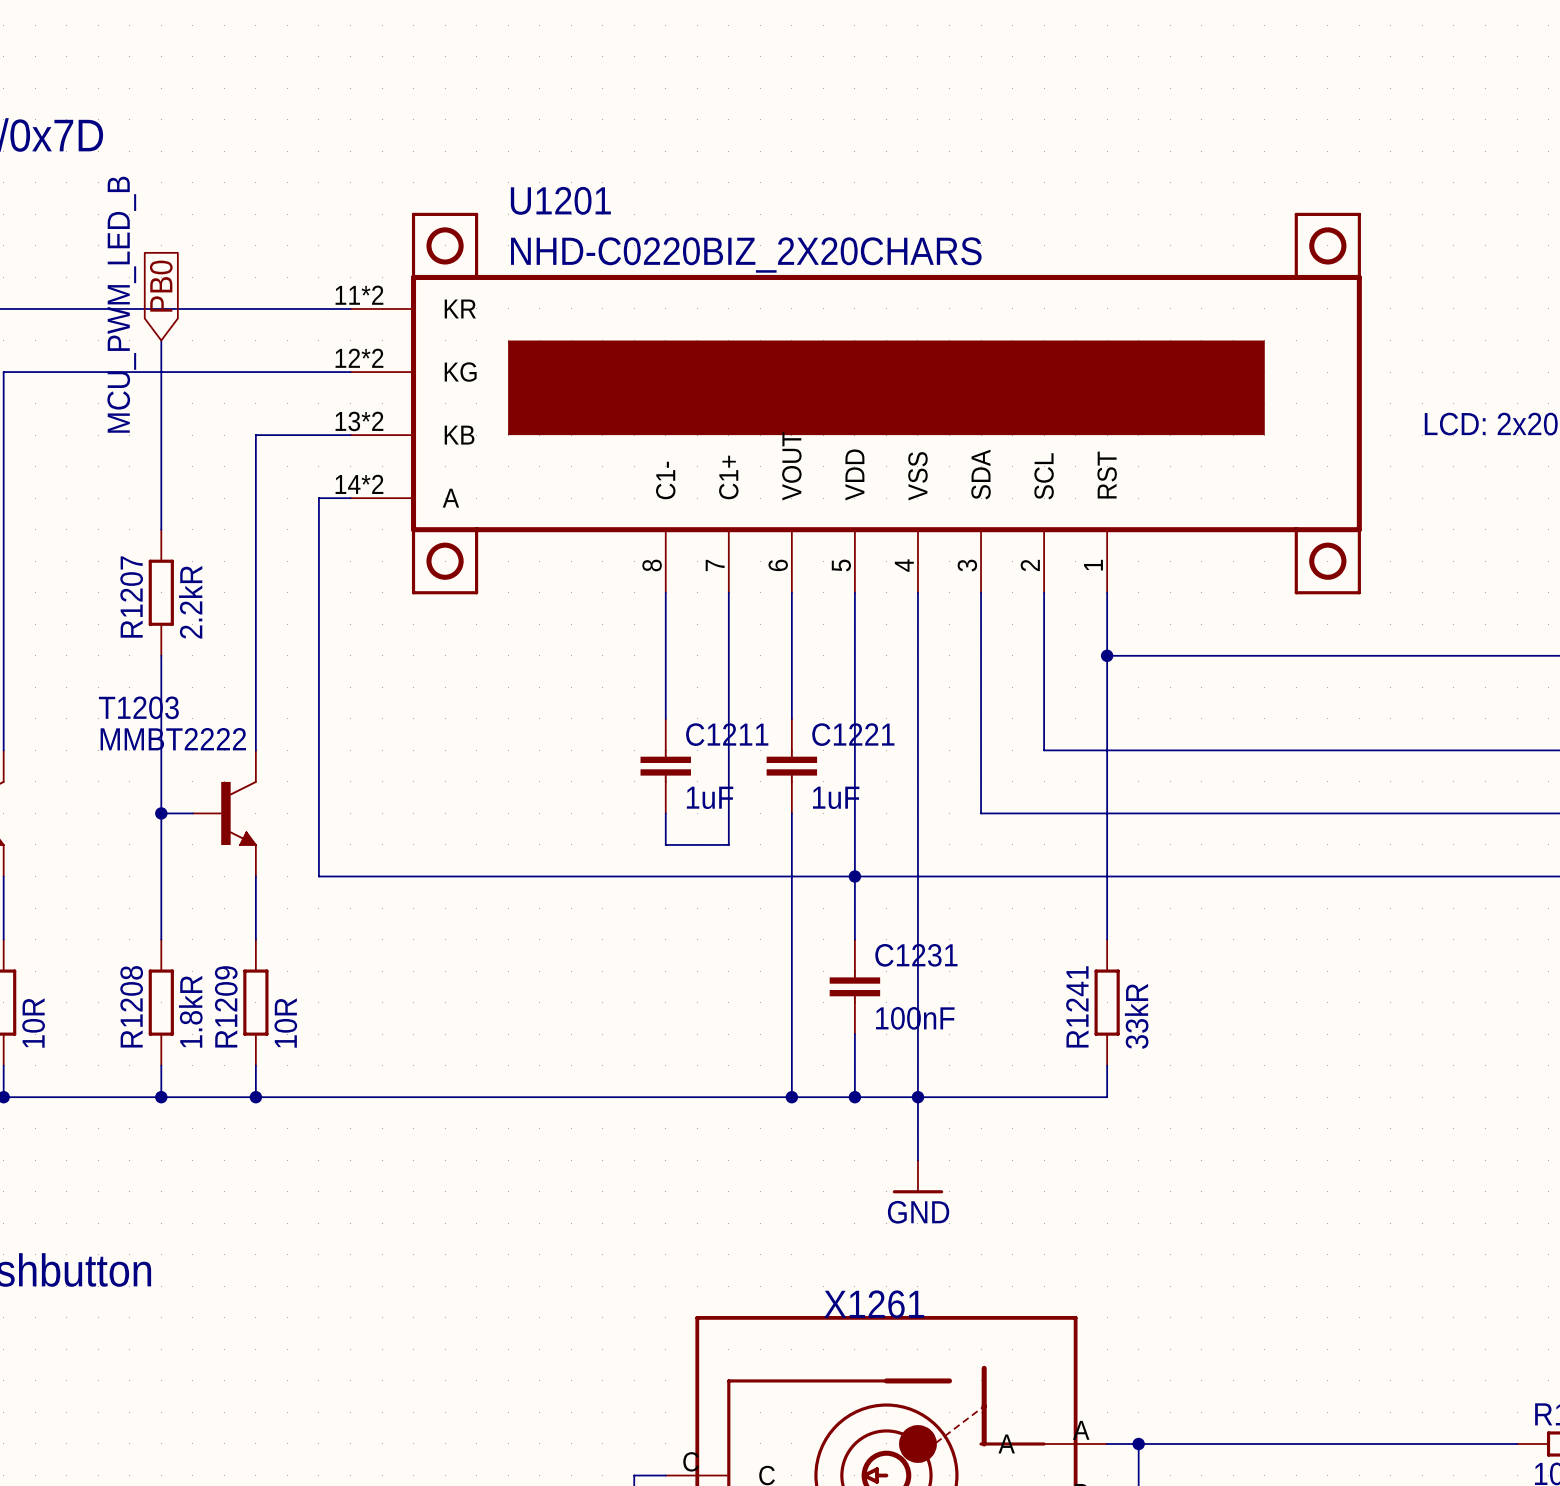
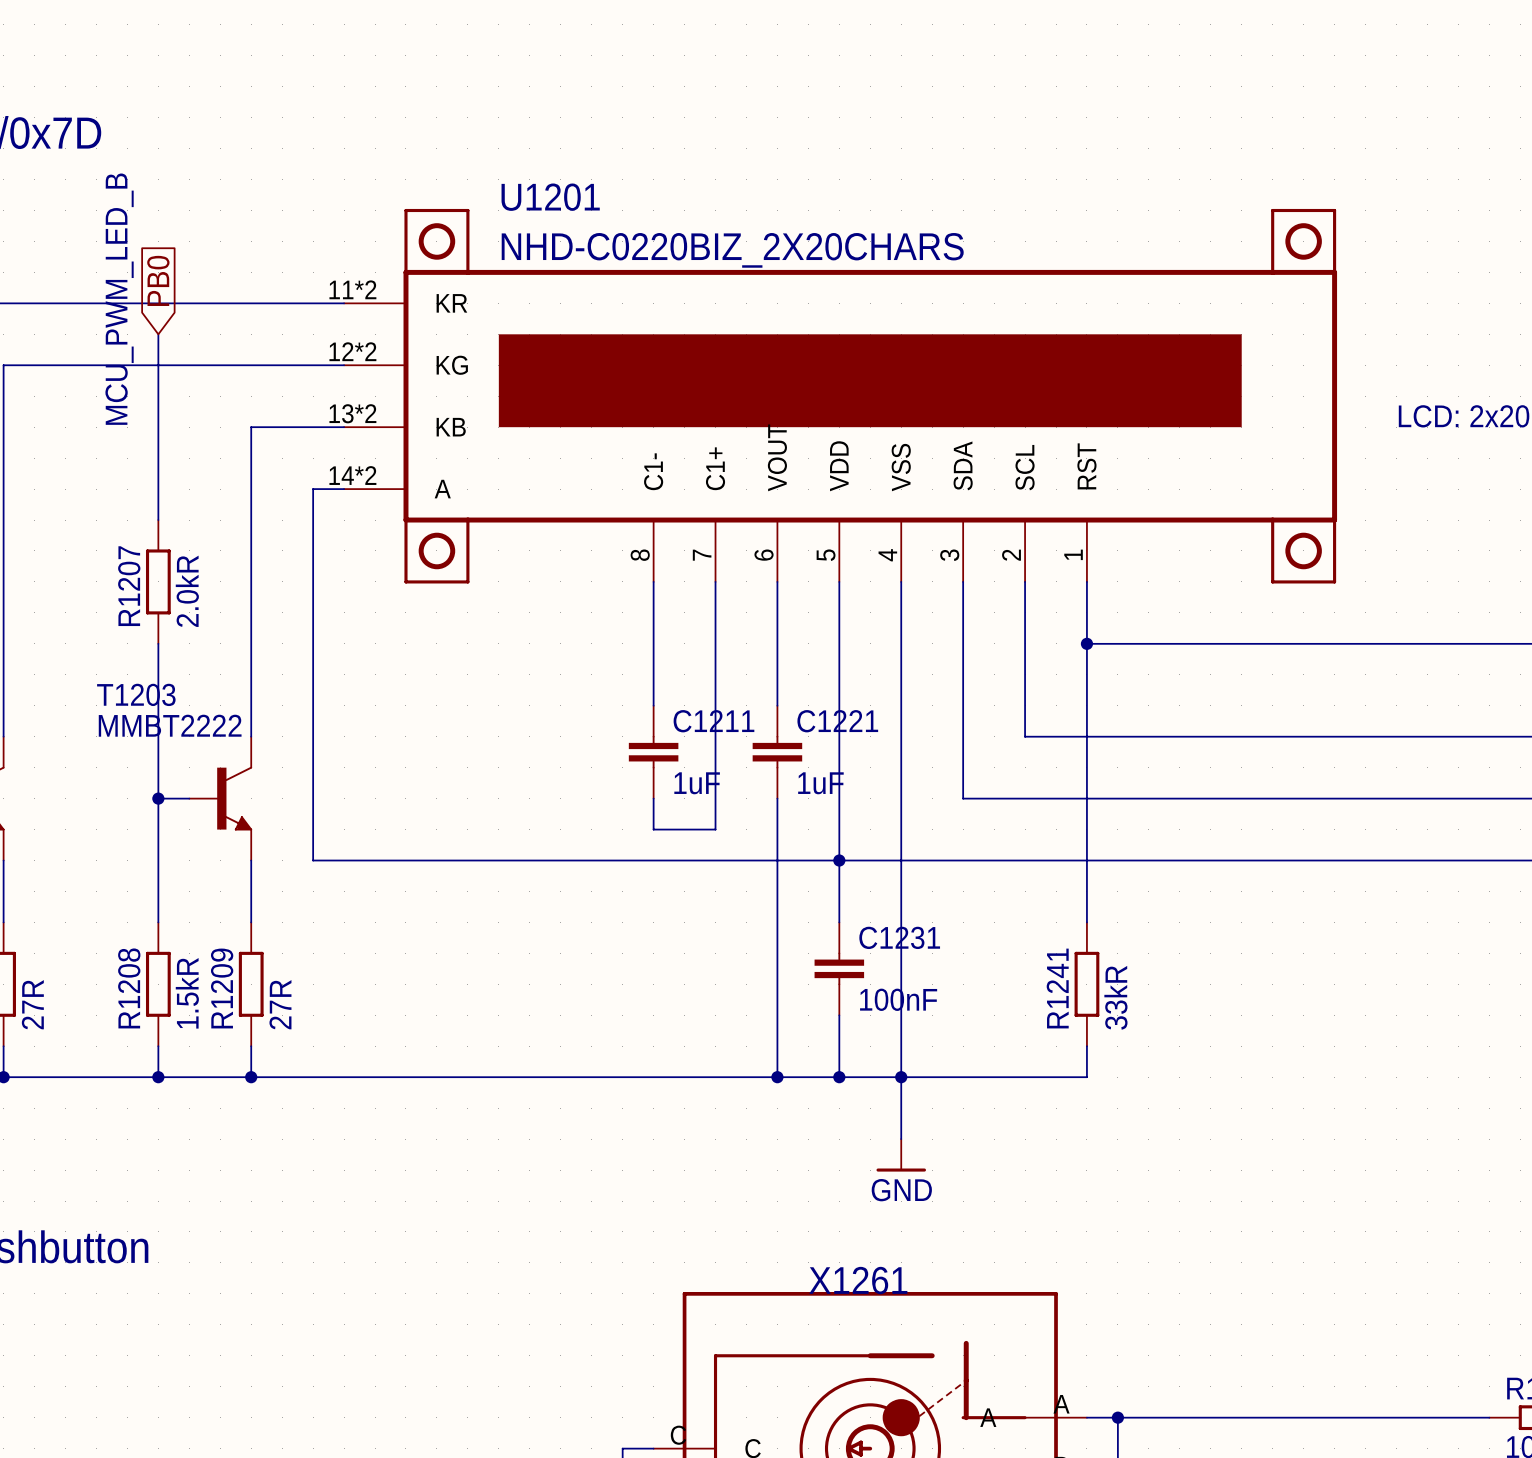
R1207 value: 2.2kR (190, 602) -> 2.0kR (187, 591)
R1208 value: 1.8kR (190, 1011) -> 1.5kR (187, 993)
part value: 10R (33, 1022) -> 27R (32, 1004)
R1209 value: 10R (285, 1022) -> 27R (280, 1004)

